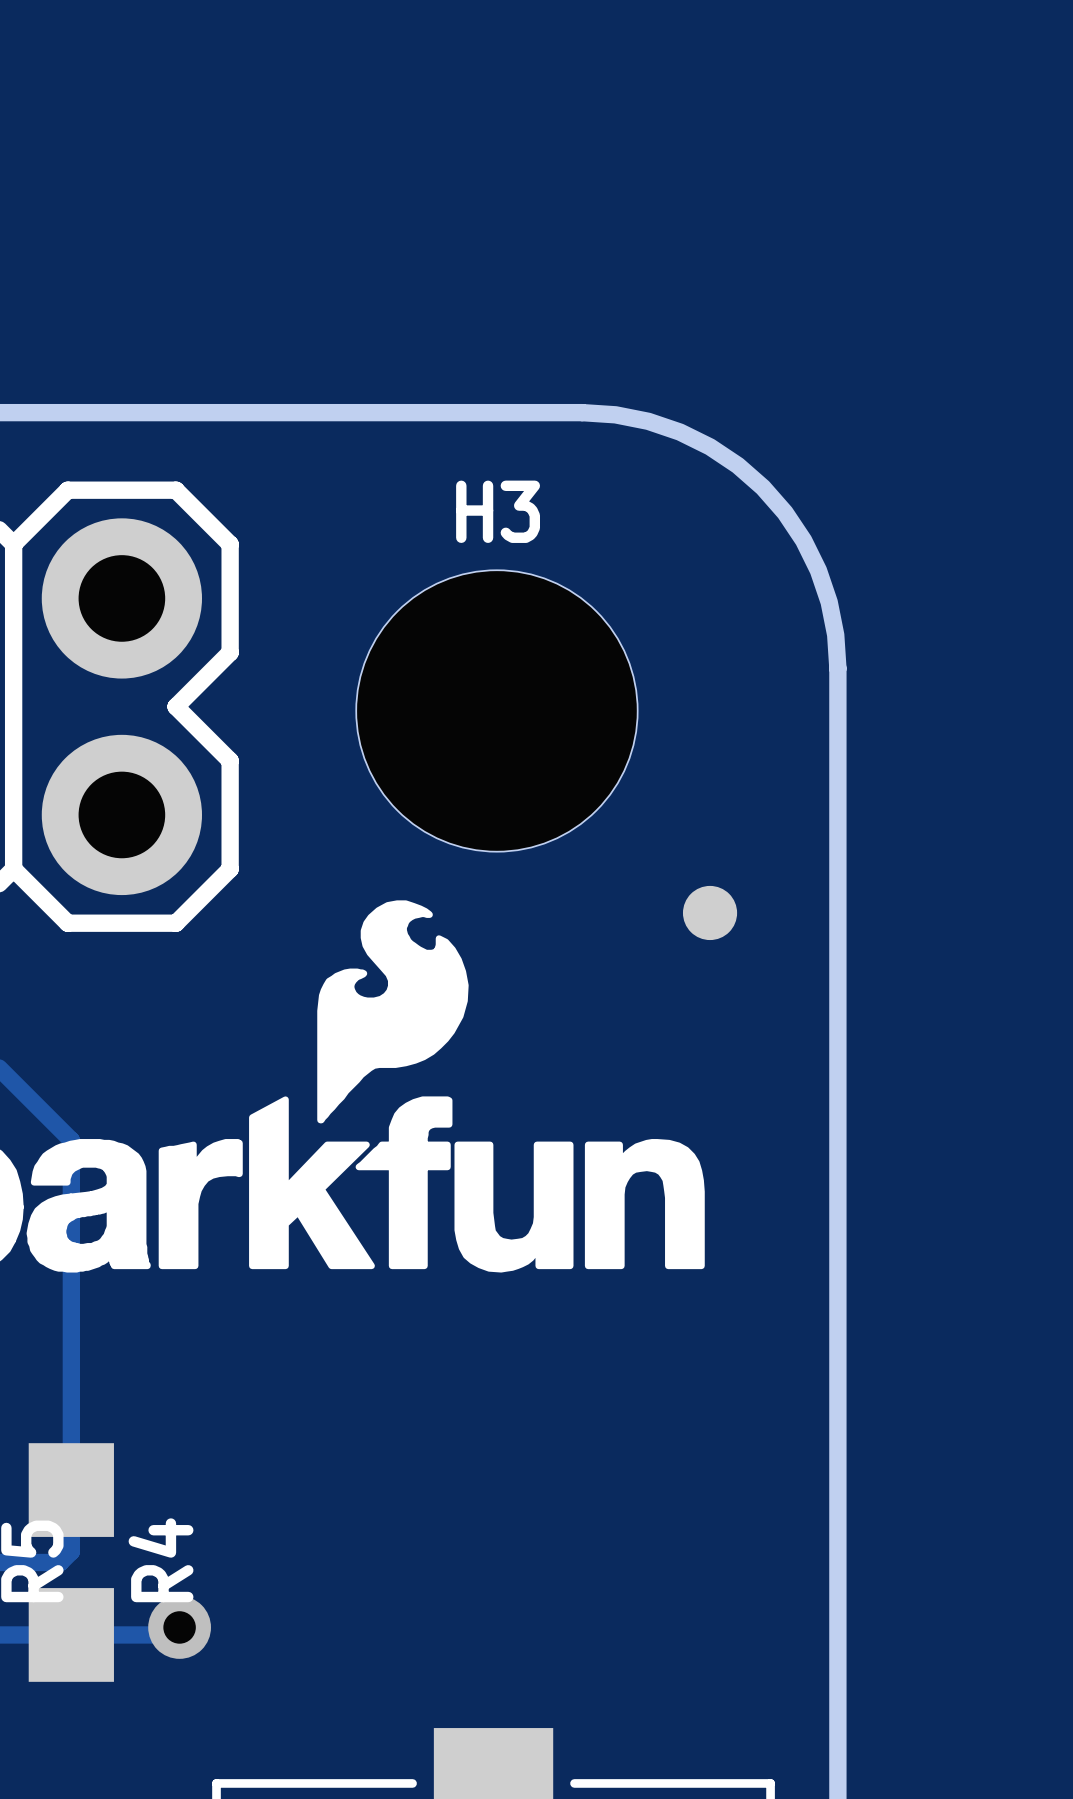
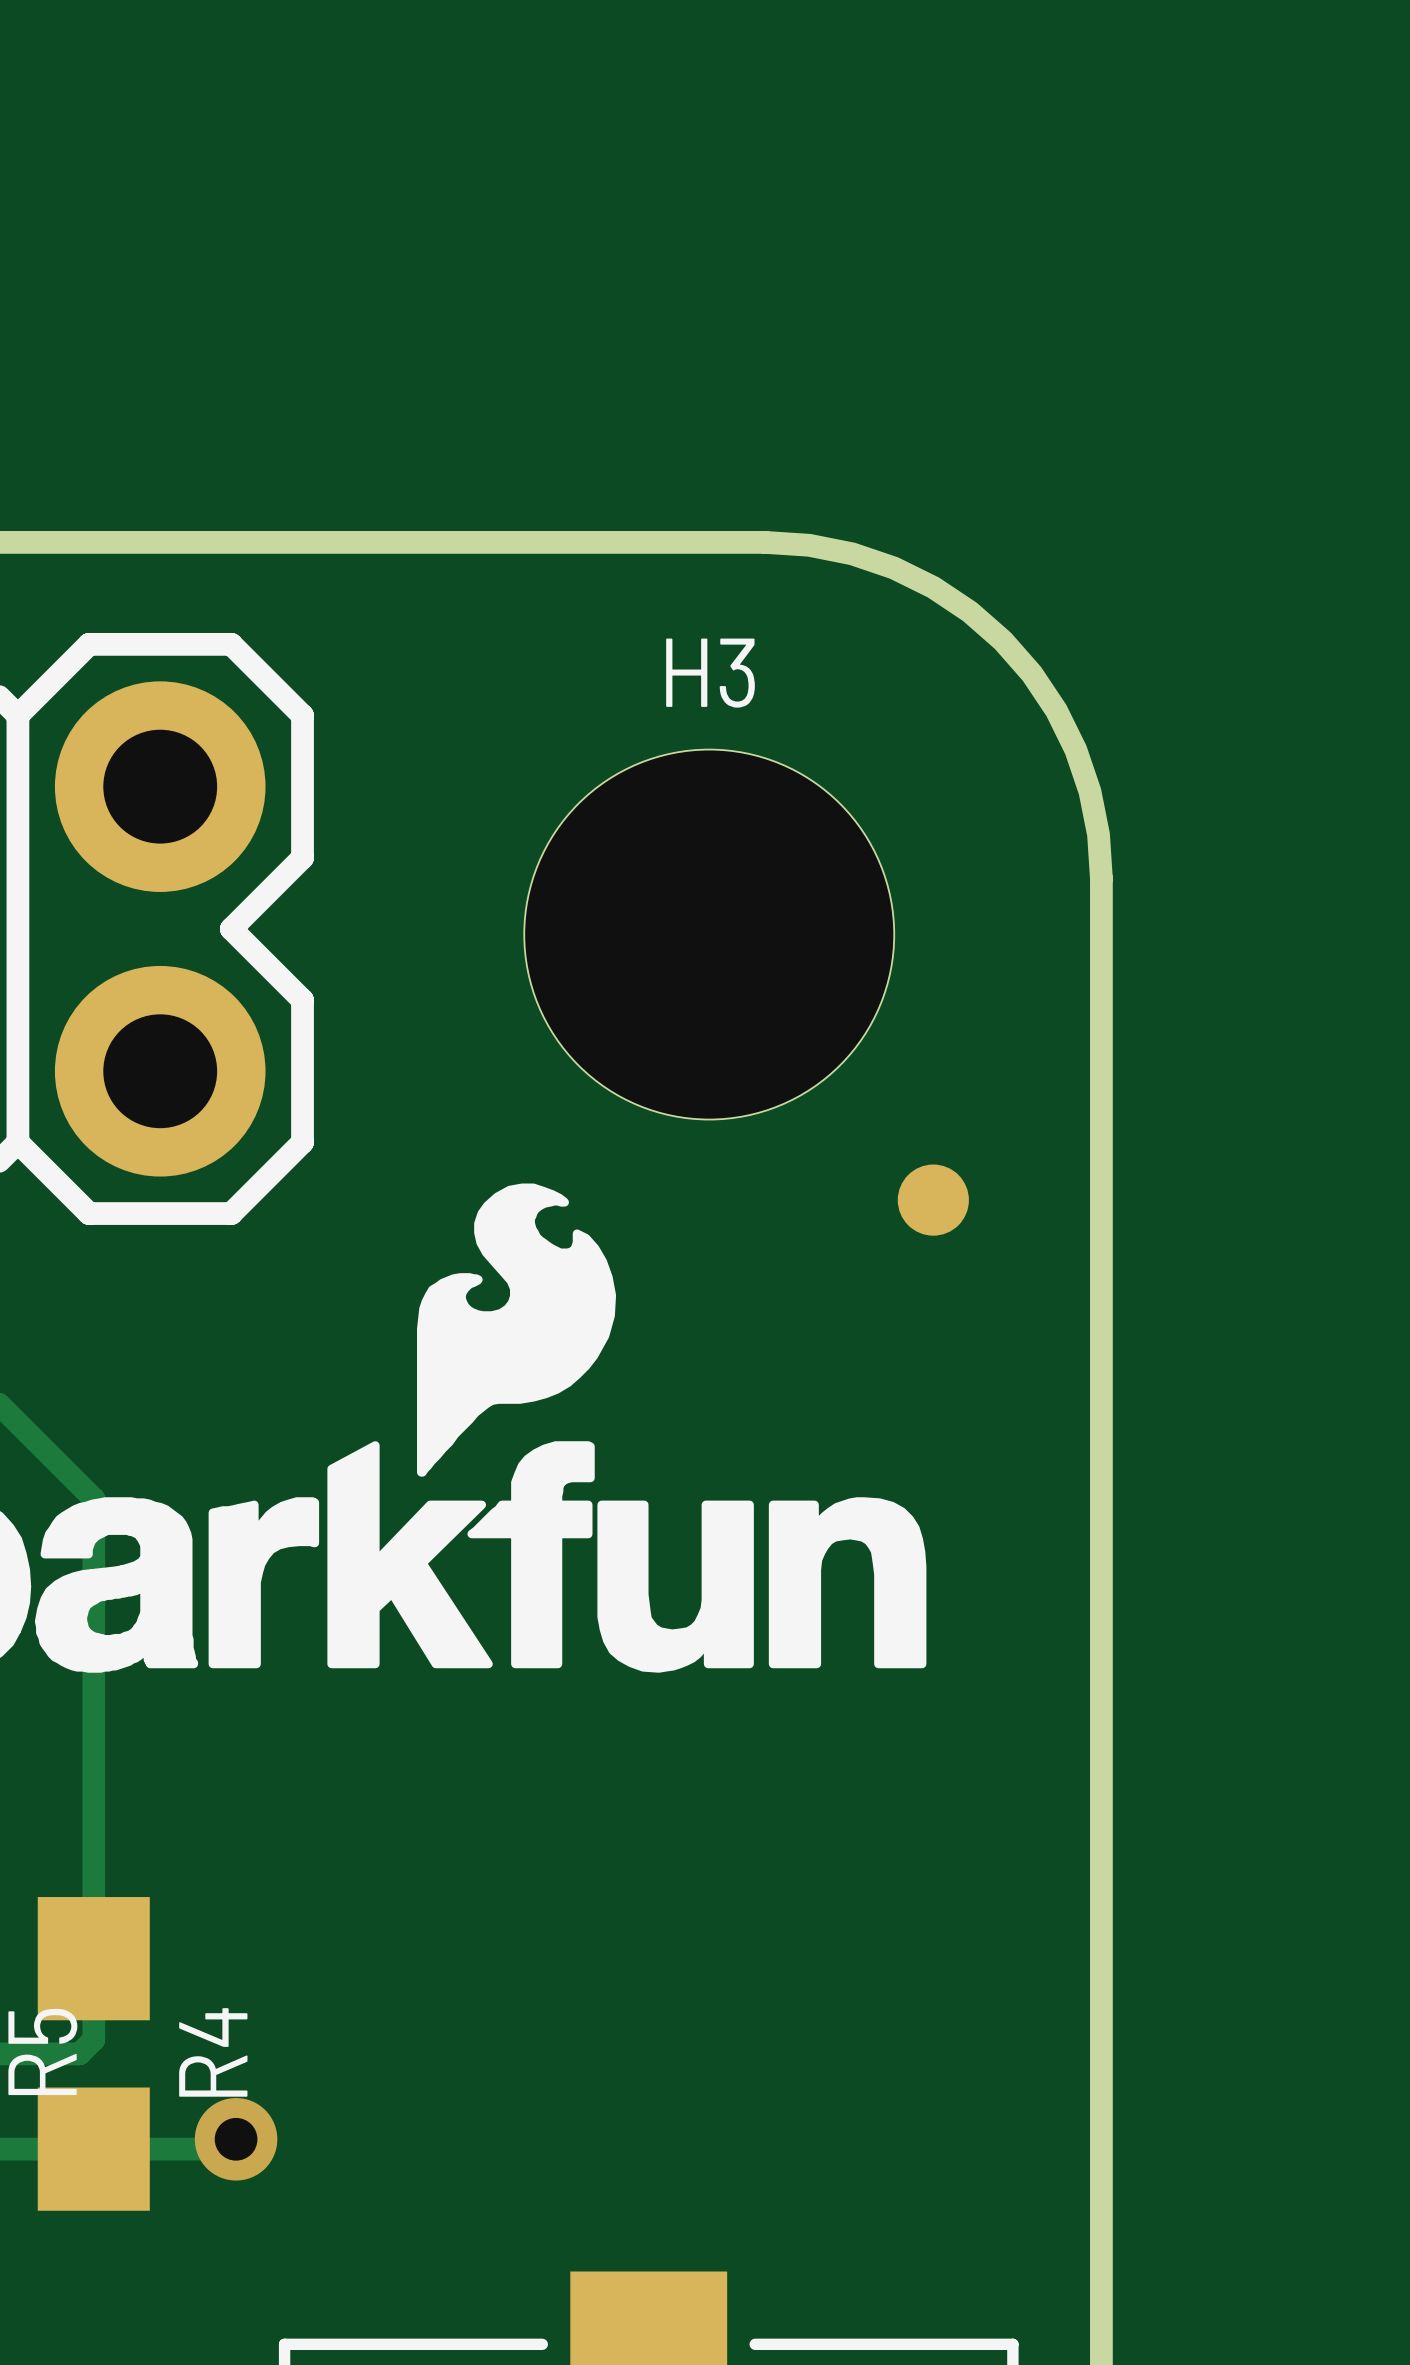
H3 position: (496, 710) -> (709, 934)

